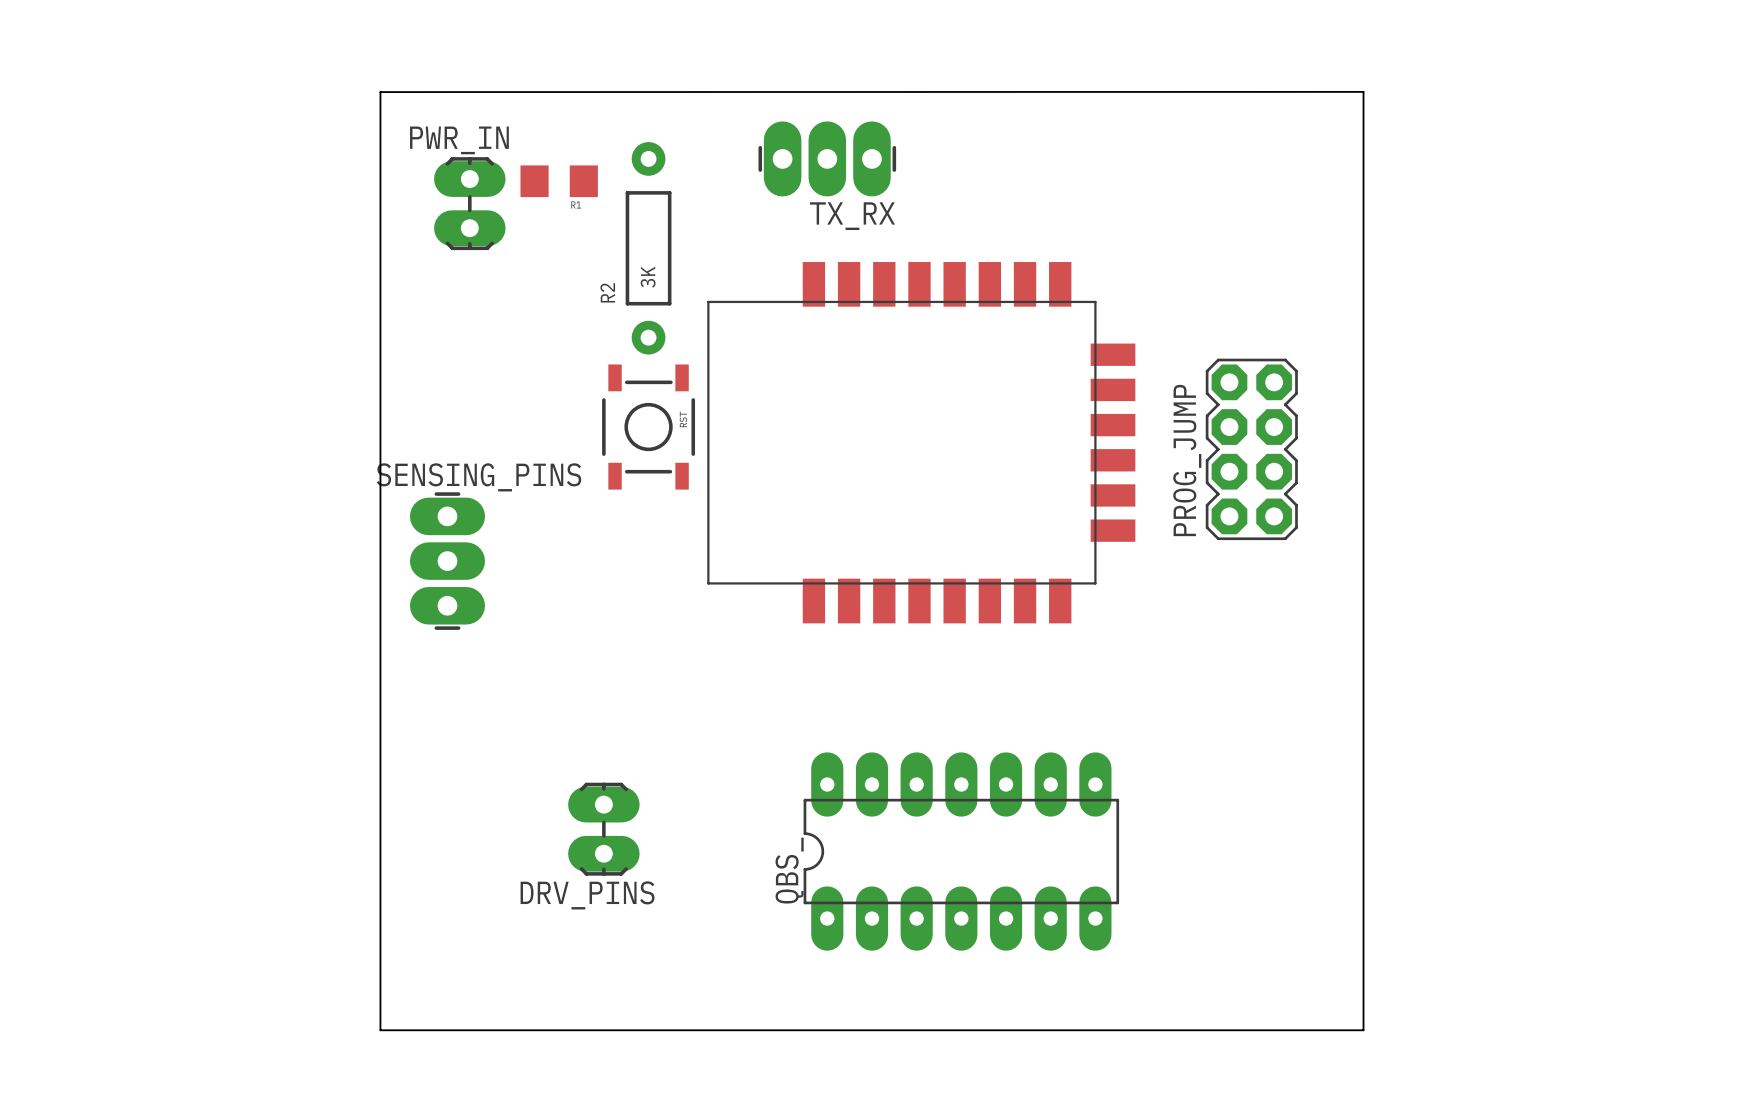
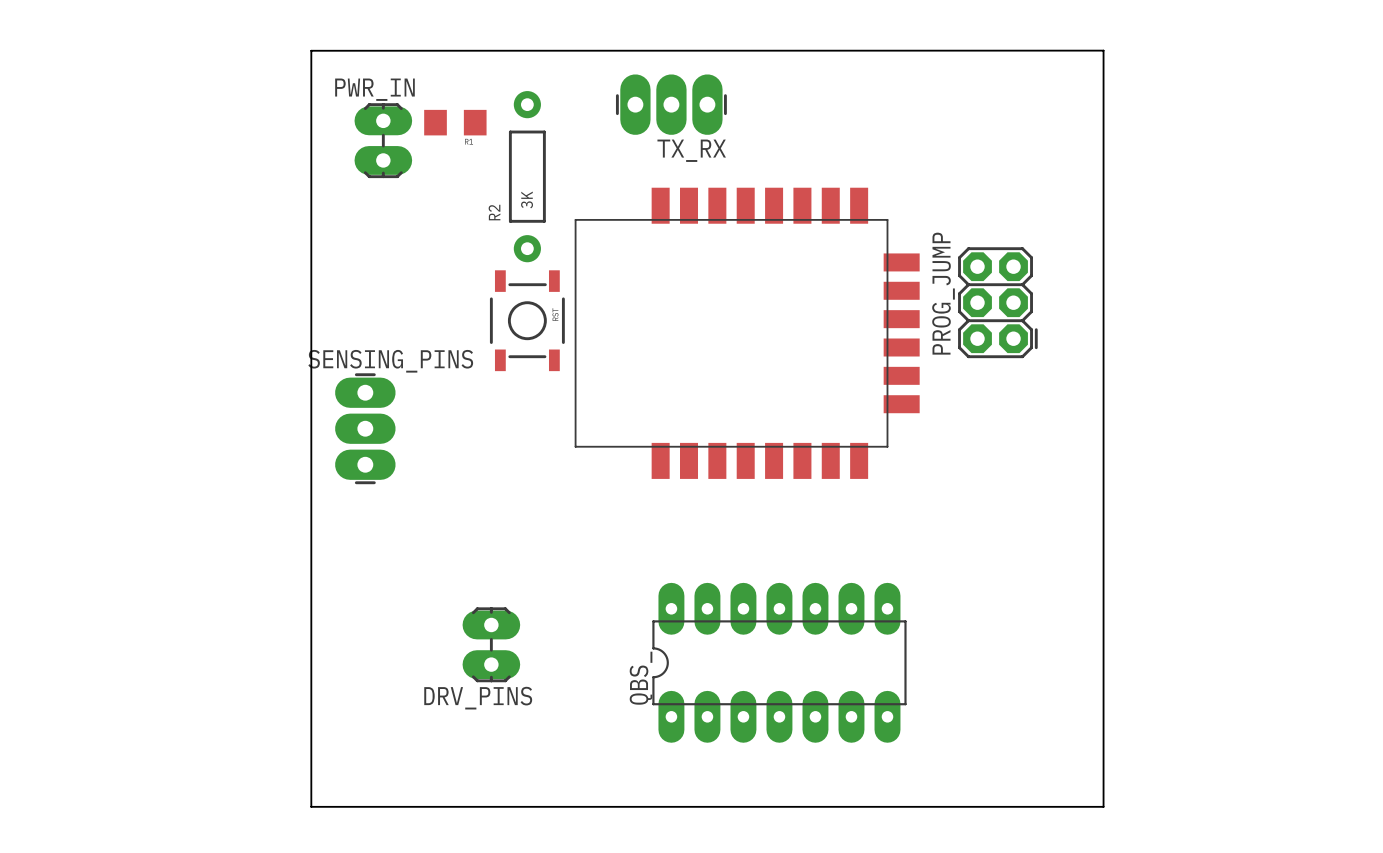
PROG_JUMP: none -> (997, 302)
PROG_JUMP: (1251, 449) -> none

